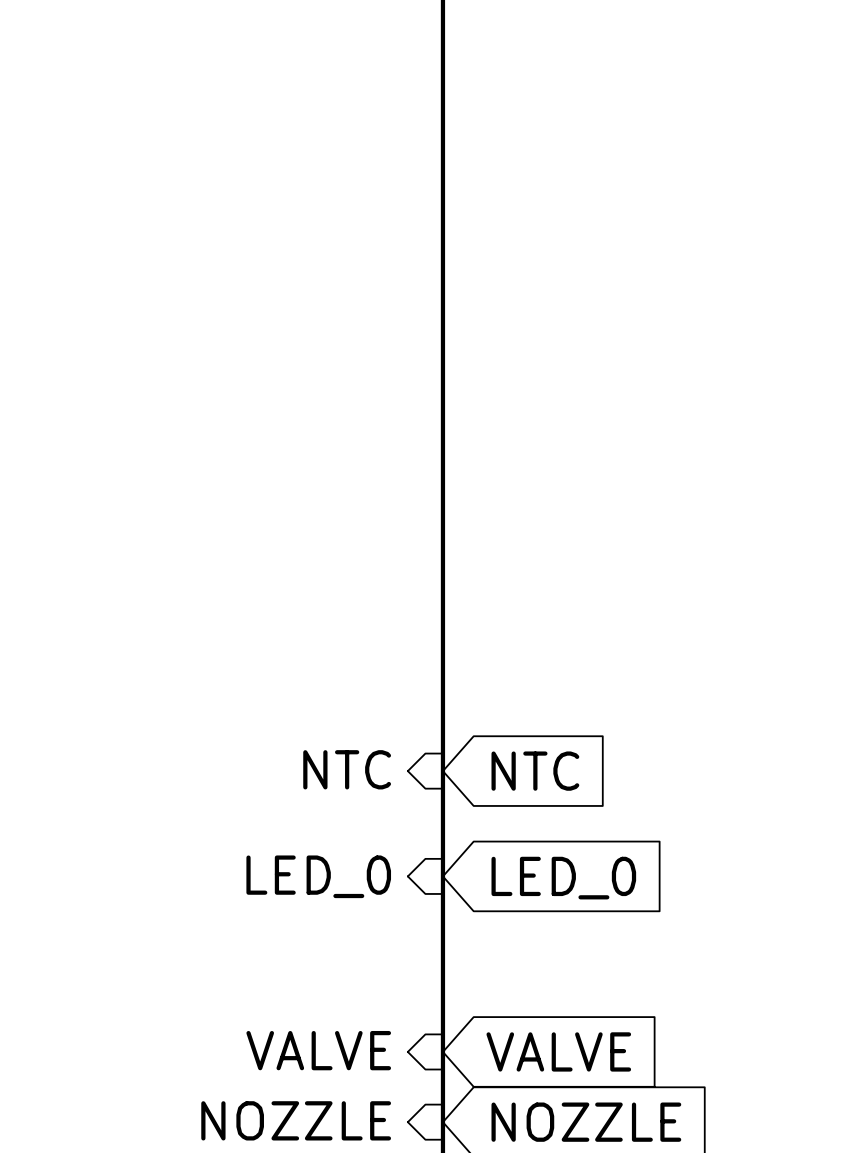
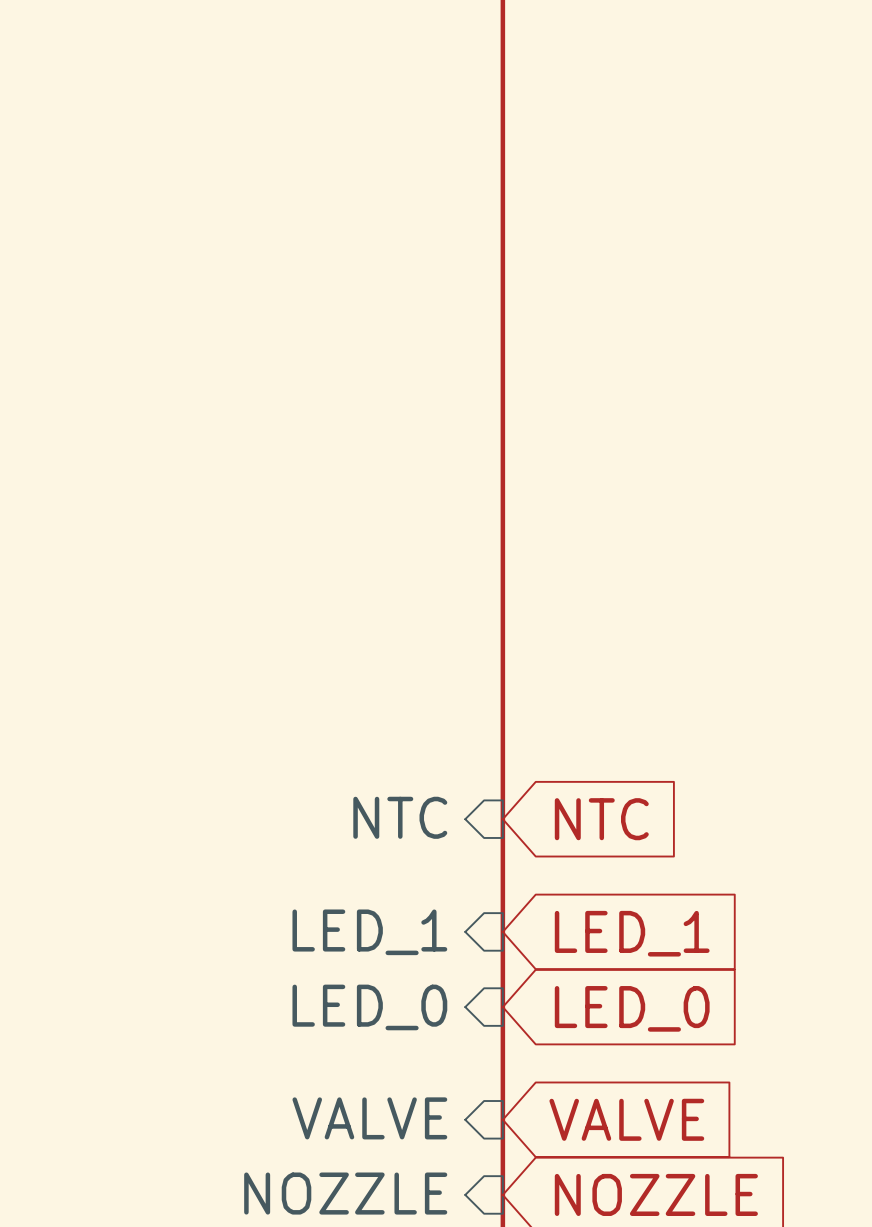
sheet pin: LED_0 (318, 876) -> LED_1 (369, 932)
global label: LED_0 (563, 878) -> LED_1 (632, 933)
sheet pin: none -> LED_0 (369, 1007)
global label: none -> LED_0 (632, 1008)

